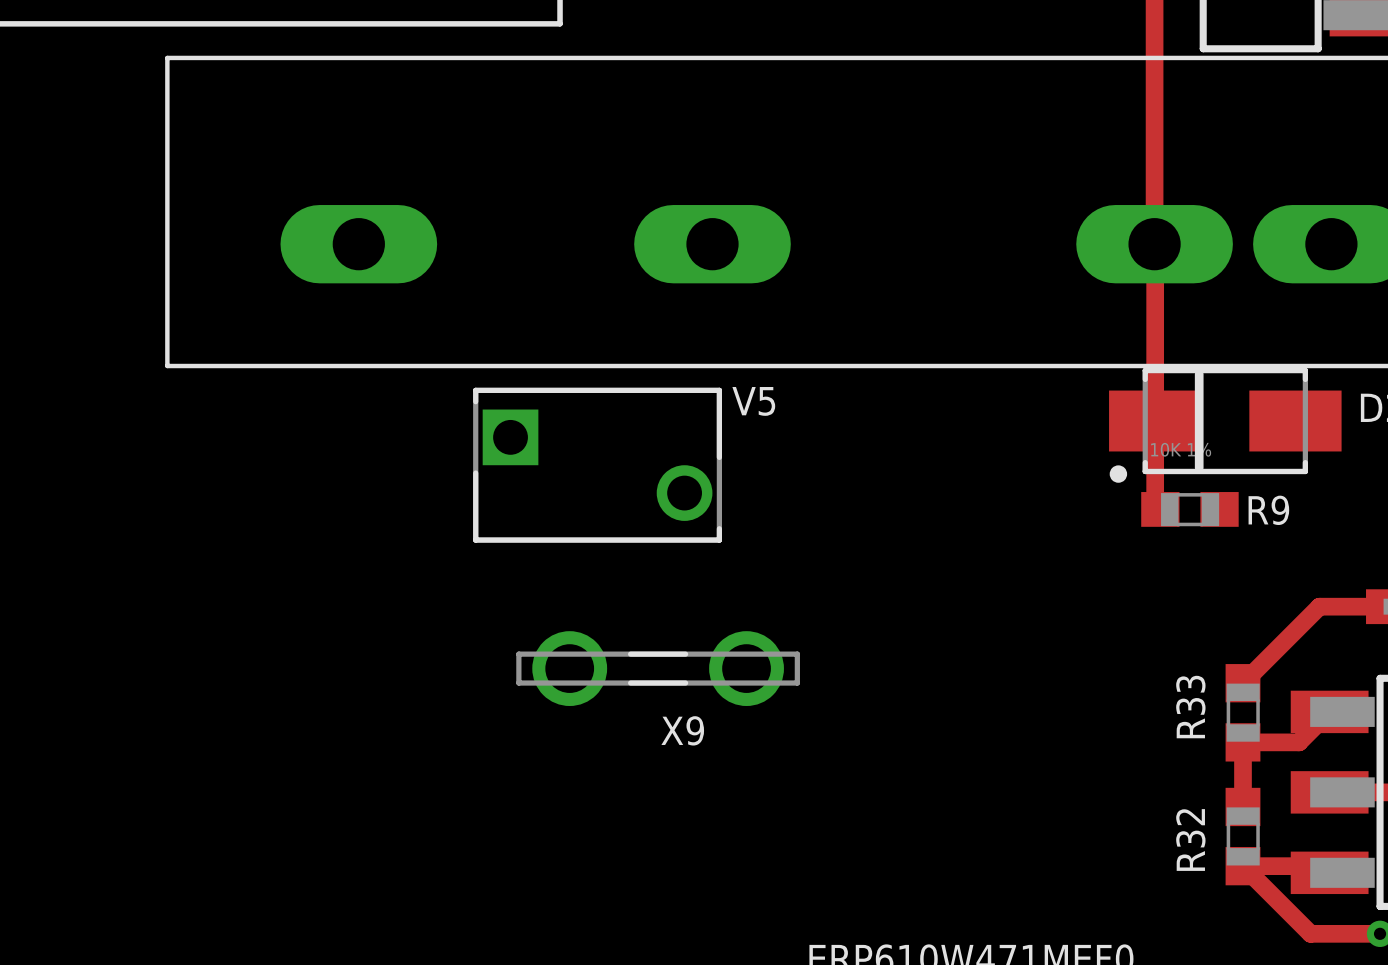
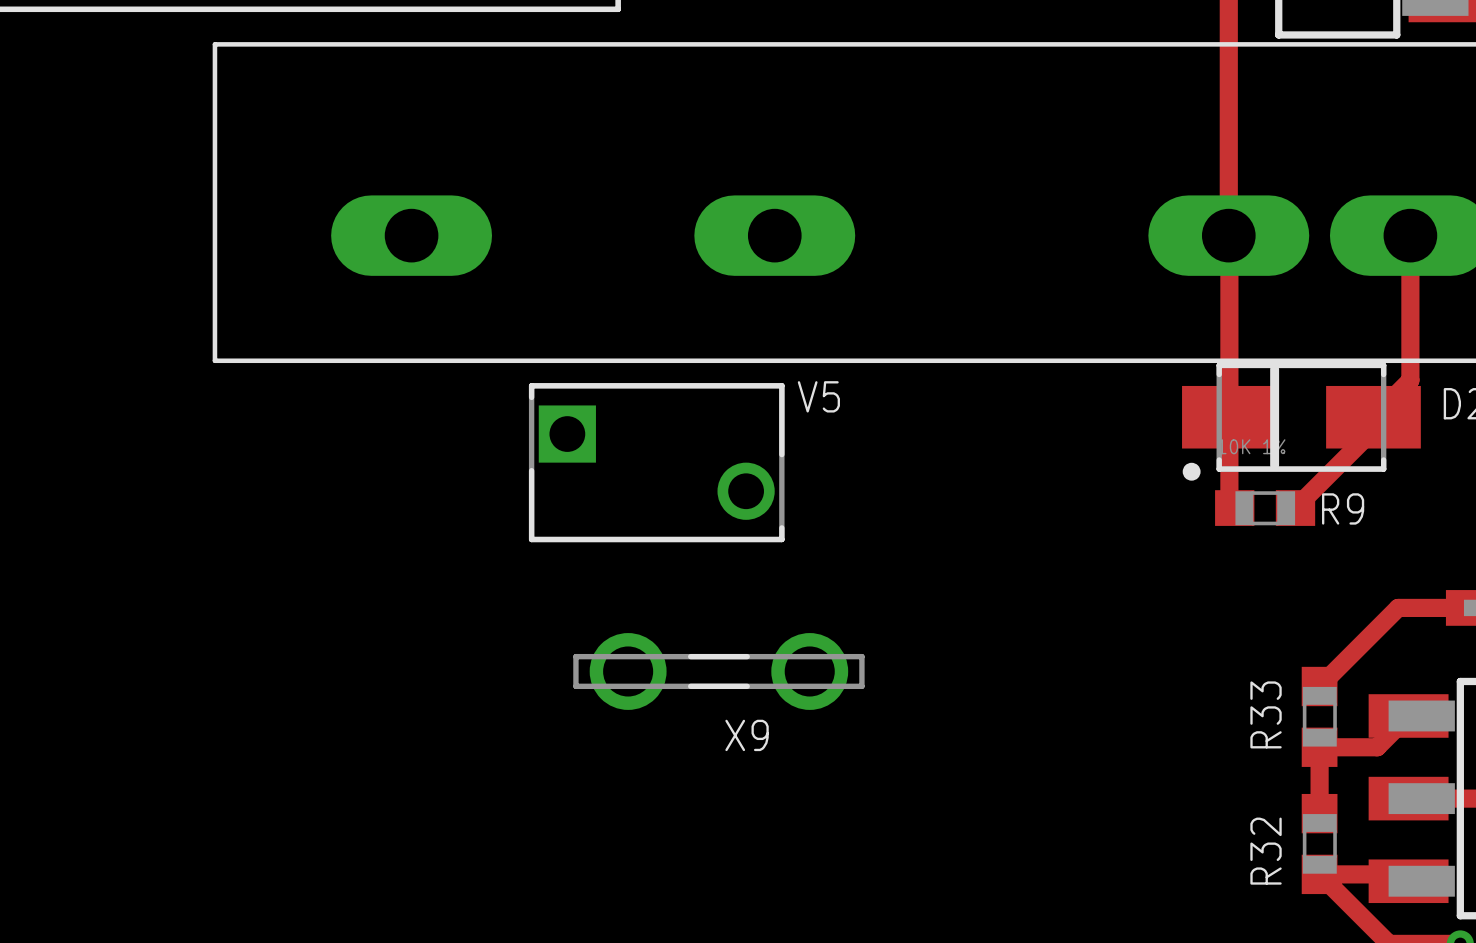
track: none -> (1410, 235) (1410, 380) (1373, 417) (1373, 430) (1295, 508)

